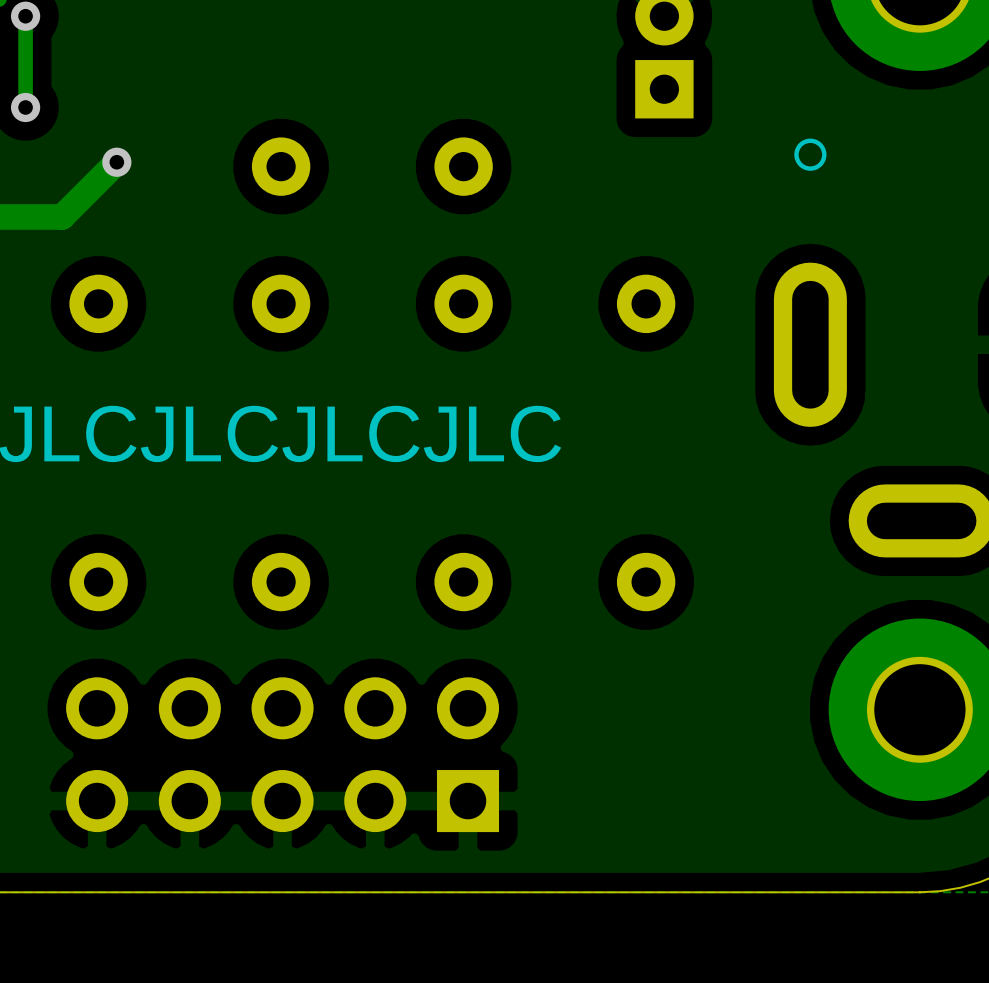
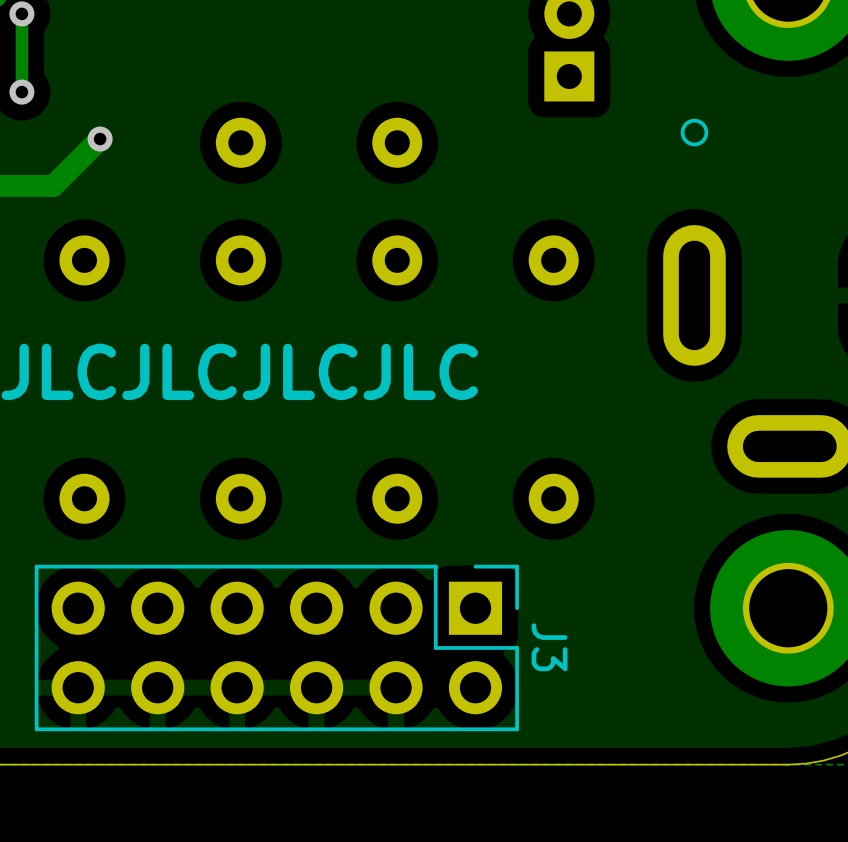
part: (282, 754) -> none
J3: none -> (276, 647)

